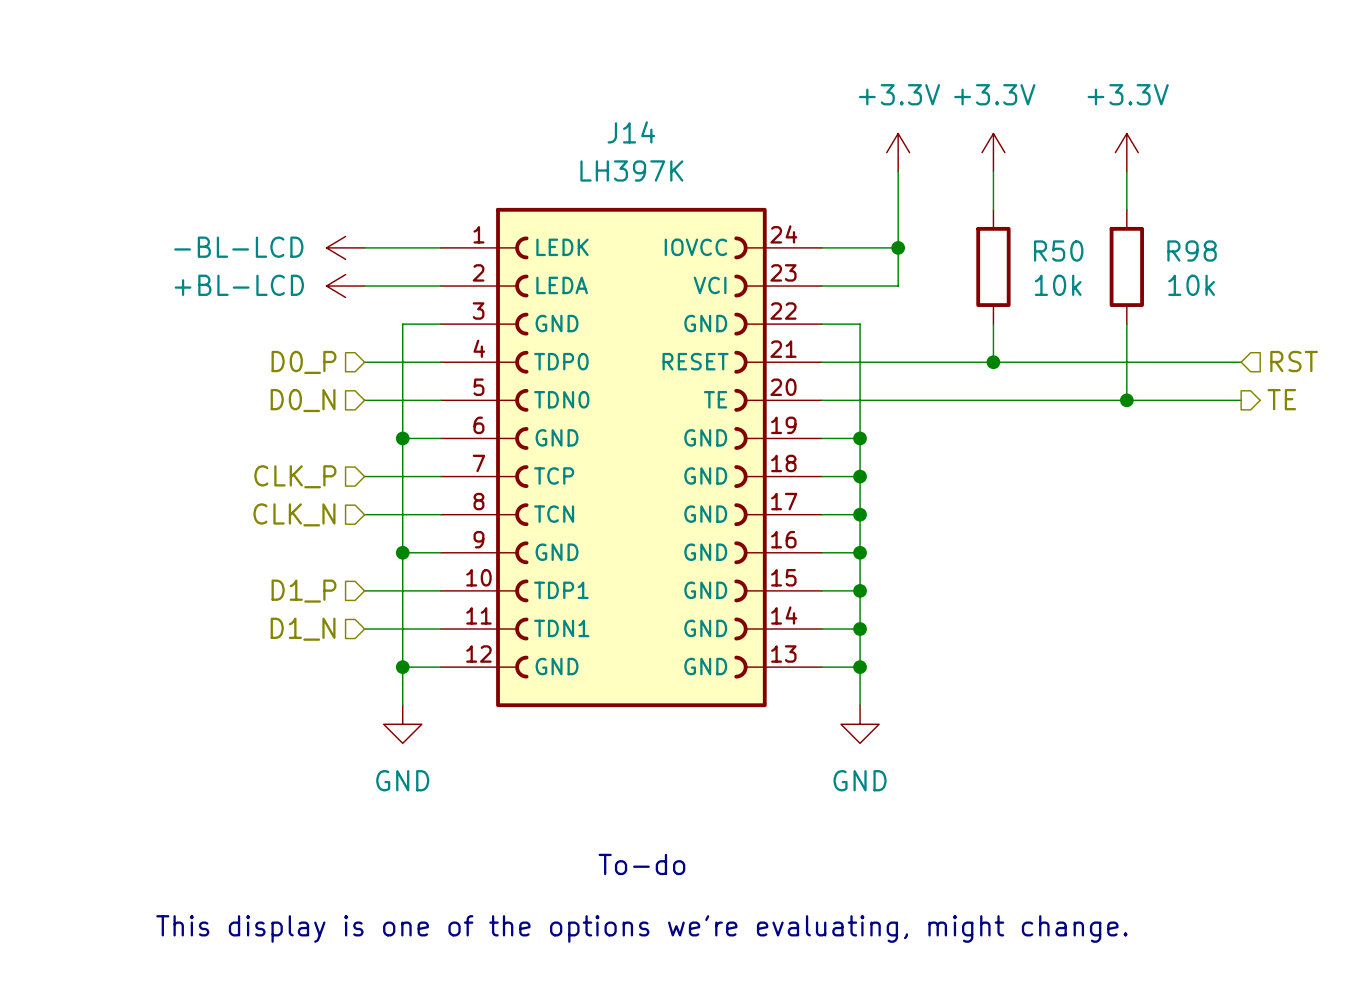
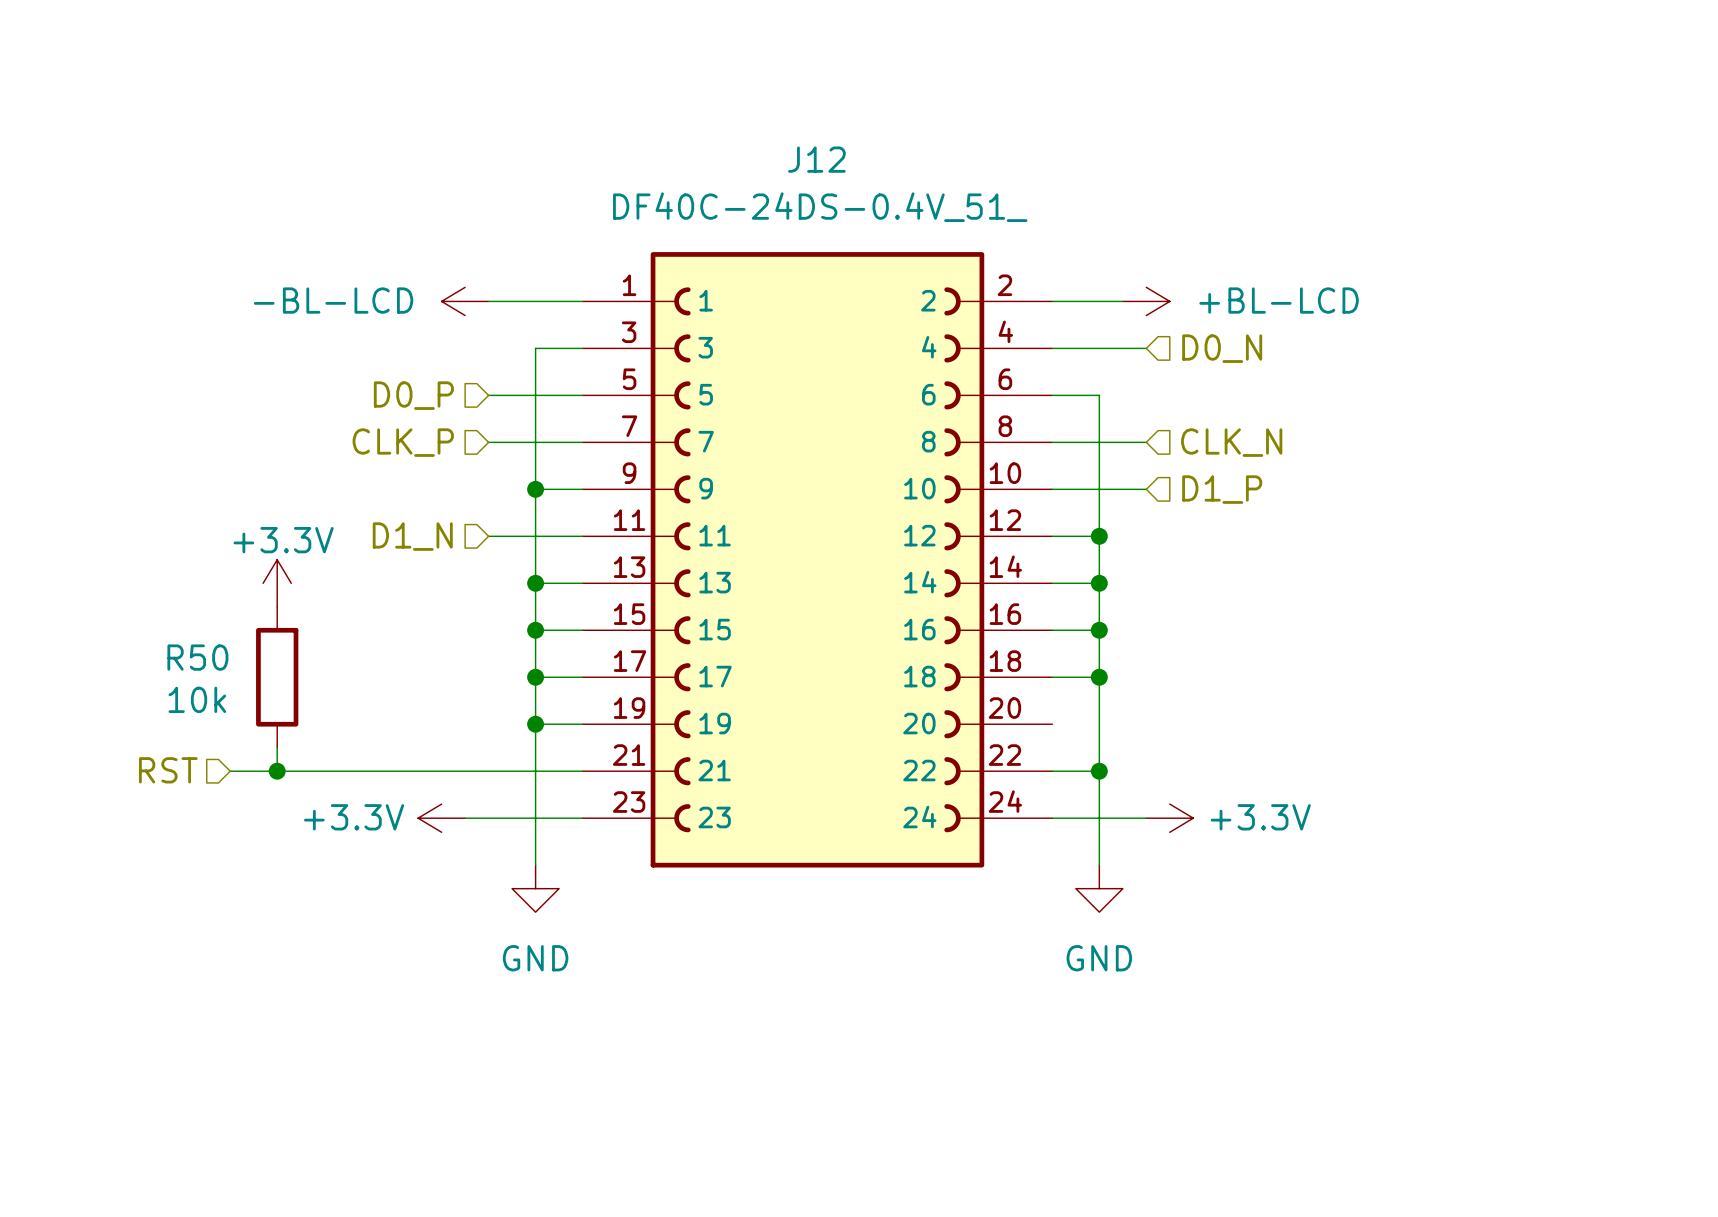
J14 name: J14 (631, 132) -> J12 (816, 159)
power symbol: +3.3V (898, 152) -> none
power symbol: +3.3V (993, 152) -> none
power symbol: +3.3V (1126, 152) -> none
J14 value: LH397K (631, 170) -> DF40C-24DS-0.4V_51_ (820, 207)
wire: (898, 171) (898, 286) -> none
wire: (993, 171) (993, 209) -> none
wire: (1126, 171) (1126, 209) -> none
J14 symbol: [440, 207, 822, 708] -> [582, 252, 1053, 868]
junction: (898, 247) -> none
power symbol: none -> +BL-LCD (1146, 301)
R50 name position: R50 (1058, 251) -> R50 (197, 657)
R50 position: (993, 266) -> (277, 677)
R98: 10k (1126, 266) -> none
R50 value position: 10k (1058, 285) -> 10k (197, 699)
power symbol: +BL-LCD (345, 286) -> none
wire: (364, 286) (402, 286) -> (488, 395) (535, 395) (535, 348)
hierarchical label: none -> D0_N (1222, 348)
hierarchical label: none -> D0_P (413, 395)
wire: (993, 324) (993, 362) -> none
wire: (1126, 324) (1126, 400) -> none
hierarchical label: RST (1294, 361) -> none
hierarchical label: D0_P (303, 362) -> CLK_P (403, 442)
wire: (898, 362) (1241, 362) -> none
hierarchical label: none -> CLK_N (1231, 442)
junction: (993, 362) -> none
hierarchical label: TE (1281, 399) -> none
hierarchical label: D0_N (303, 400) -> none
wire: (364, 400) (402, 400) -> (488, 536) (535, 536)
junction: none -> (535, 489)
wire: (898, 400) (1241, 400) -> none
hierarchical label: none -> D1_P (1222, 489)
junction: (1126, 400) -> none
junction: (402, 438) -> none
power symbol: none -> +3.3V (277, 583)
hierarchical label: CLK_P (295, 476) -> none
wire: (364, 476) (402, 476) -> none
junction: none -> (535, 583)
hierarchical label: CLK_N (294, 514) -> none
wire: (364, 514) (402, 514) -> none
junction: none -> (535, 630)
wire: (364, 590) (402, 590) -> none
junction: none -> (535, 724)
wire: (821, 590) (860, 590) -> (1099, 818) (1146, 818)
junction: (860, 590) -> none
hierarchical label: D1_P (303, 591) -> none
wire: none -> (277, 747) (277, 771)
hierarchical label: none -> RST (168, 770)
wire: none -> (230, 771) (488, 771)
junction: none -> (277, 771)
hierarchical label position: D1_N (303, 629) -> D1_N (412, 536)
power symbol: none -> +3.3V (441, 818)
wire: none -> (465, 818) (535, 818)
junction: (402, 667) -> none
junction: (860, 667) -> none
power symbol: none -> +3.3V (1169, 818)
text: To-do (641, 864) -> none
text: This display is one of the options we're evaluating, might change. (641, 928) -> none

